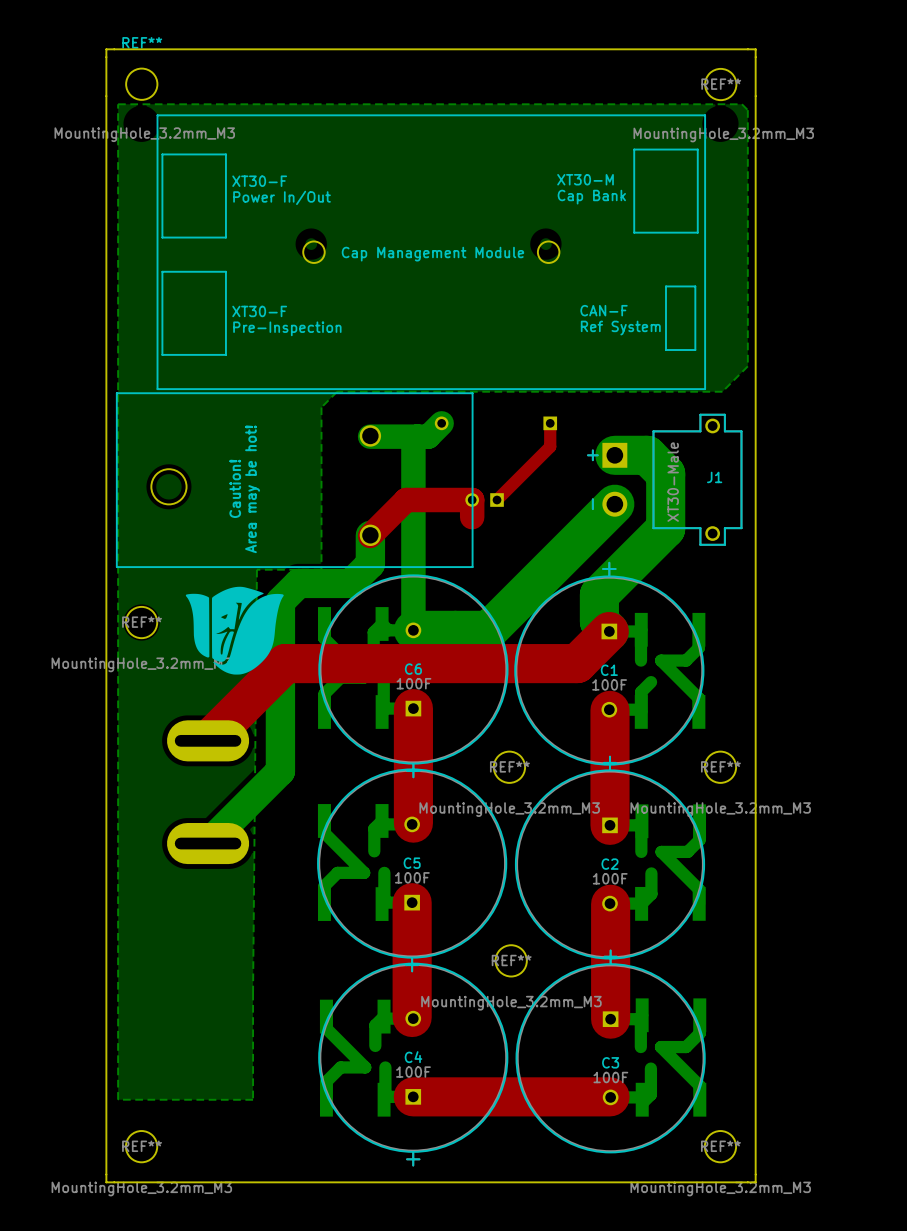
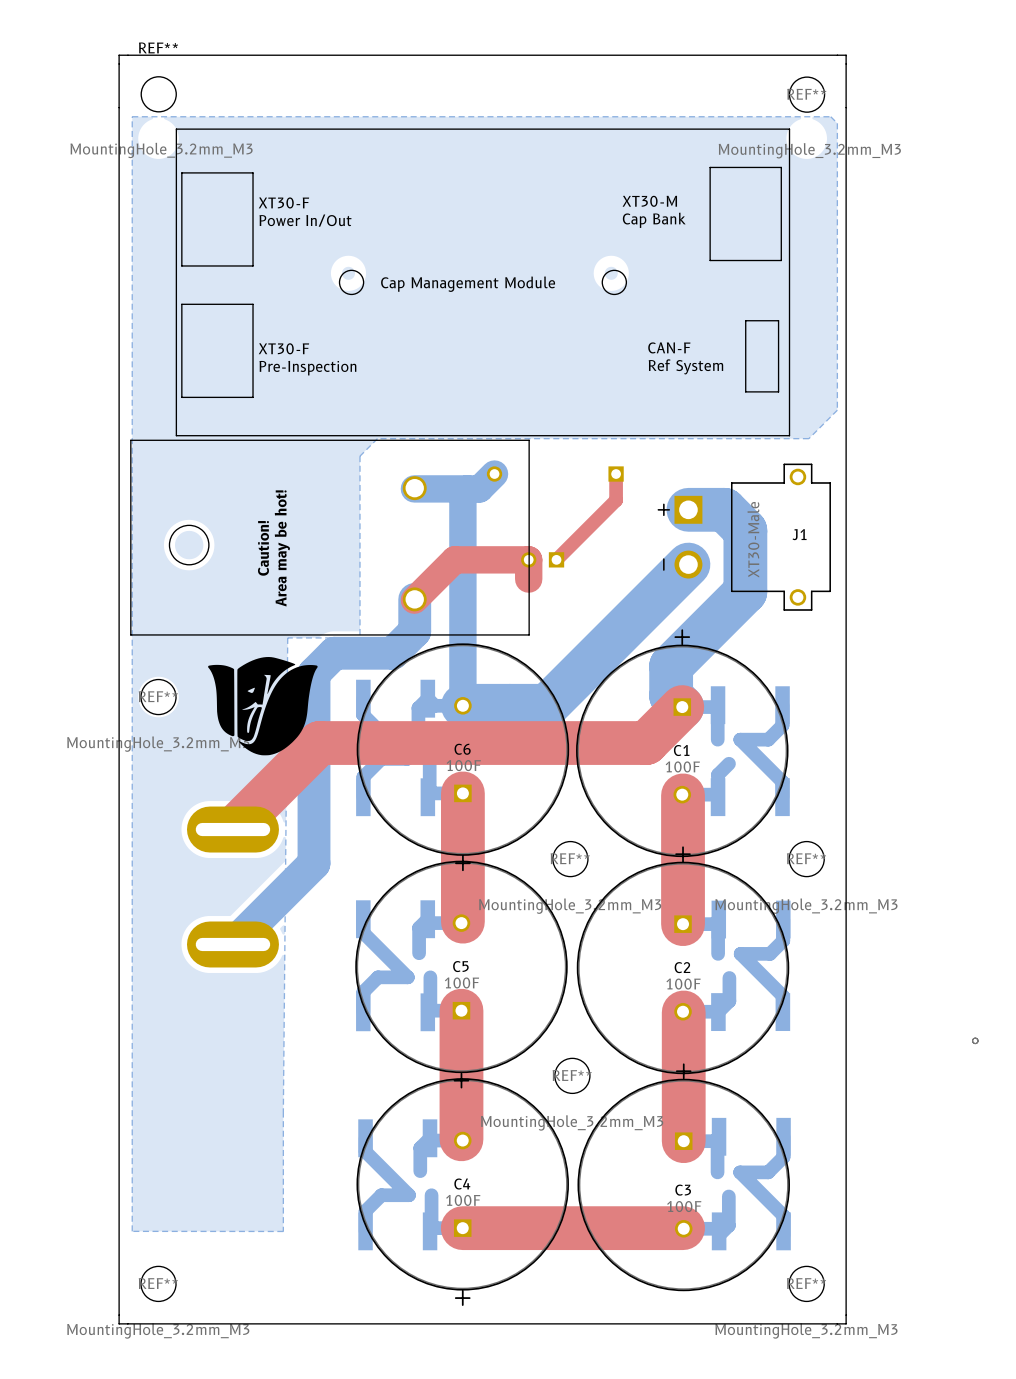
via: none -> (975, 1040)

